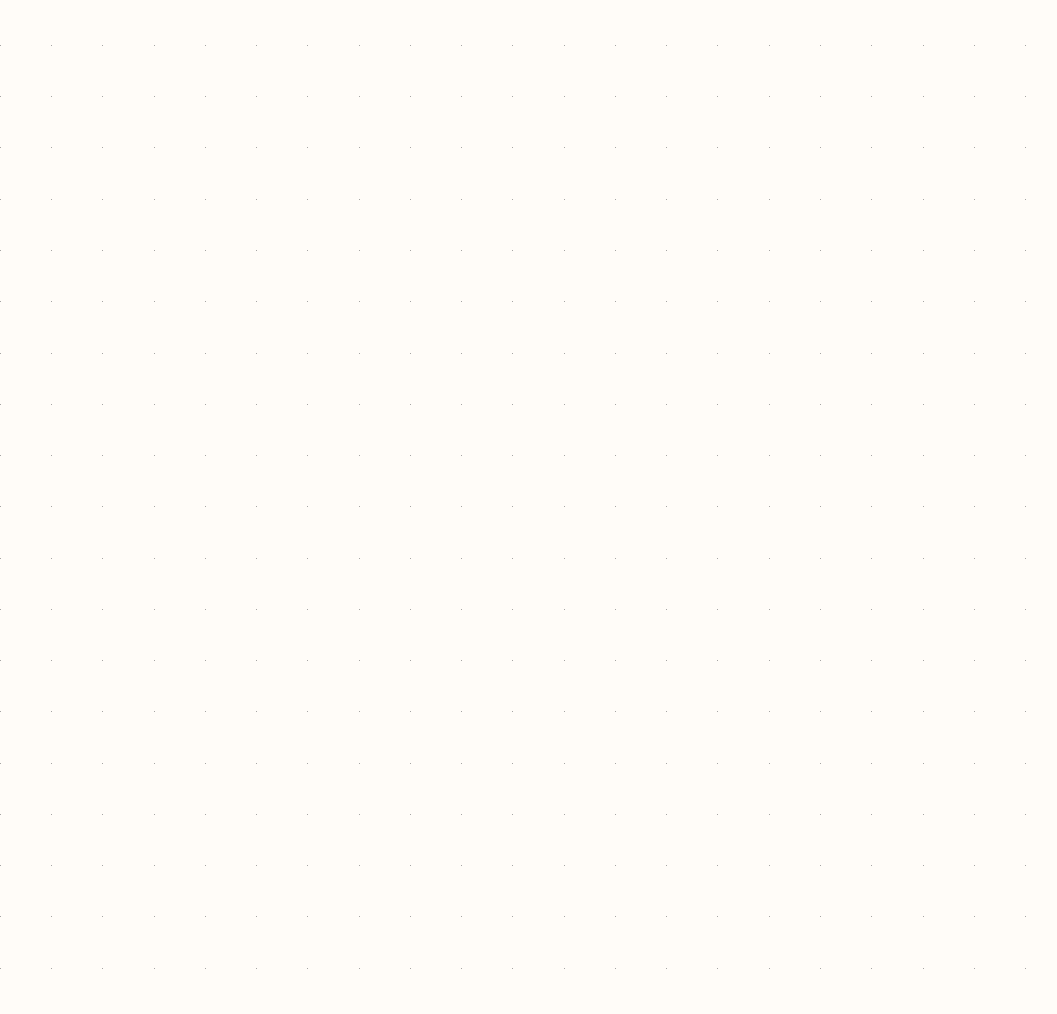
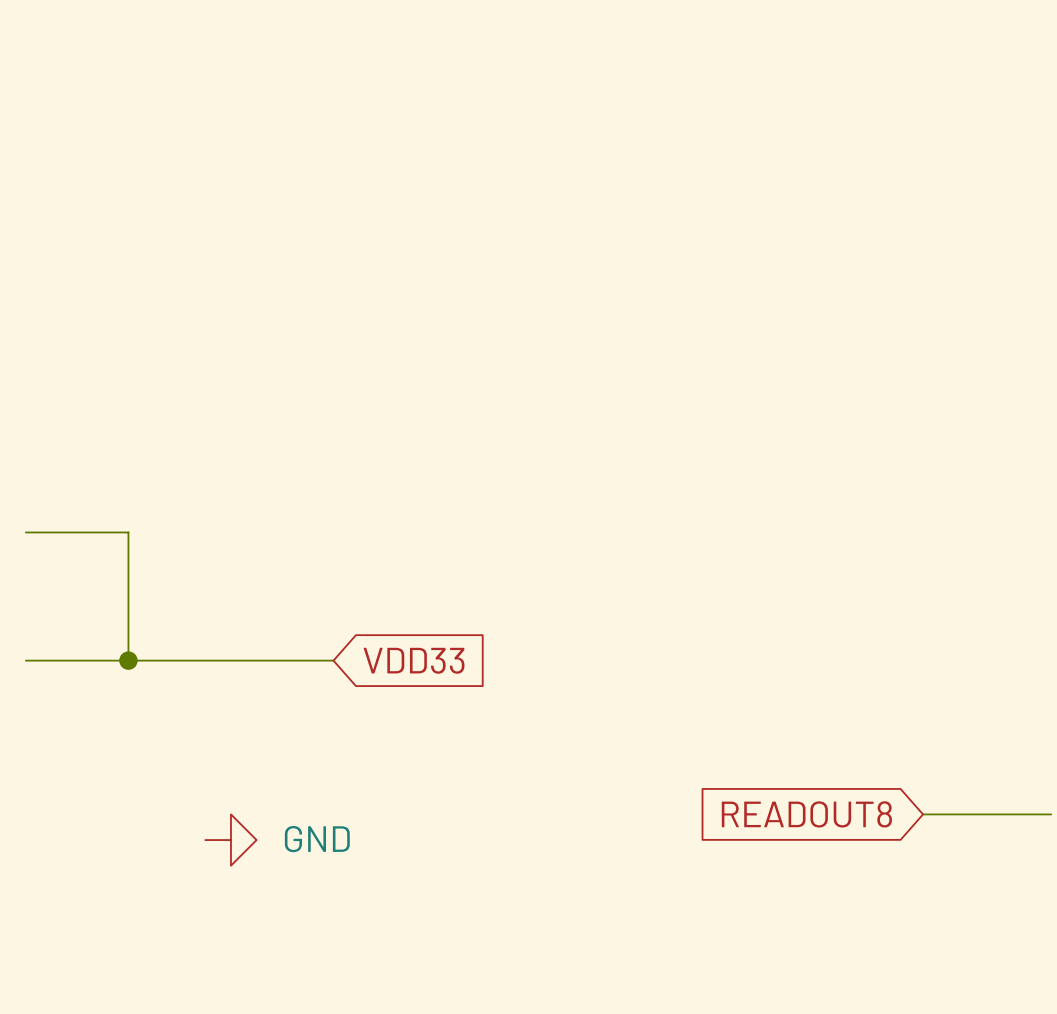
wire: none -> (25, 532) (128, 532) (128, 660)
wire: none -> (25, 660) (333, 660)
junction: none -> (128, 660)
global label: none -> VDD33 (414, 660)
global label: none -> READOUT8 (806, 814)
wire: none -> (923, 814) (1051, 814)
power symbol: none -> GND (230, 840)

